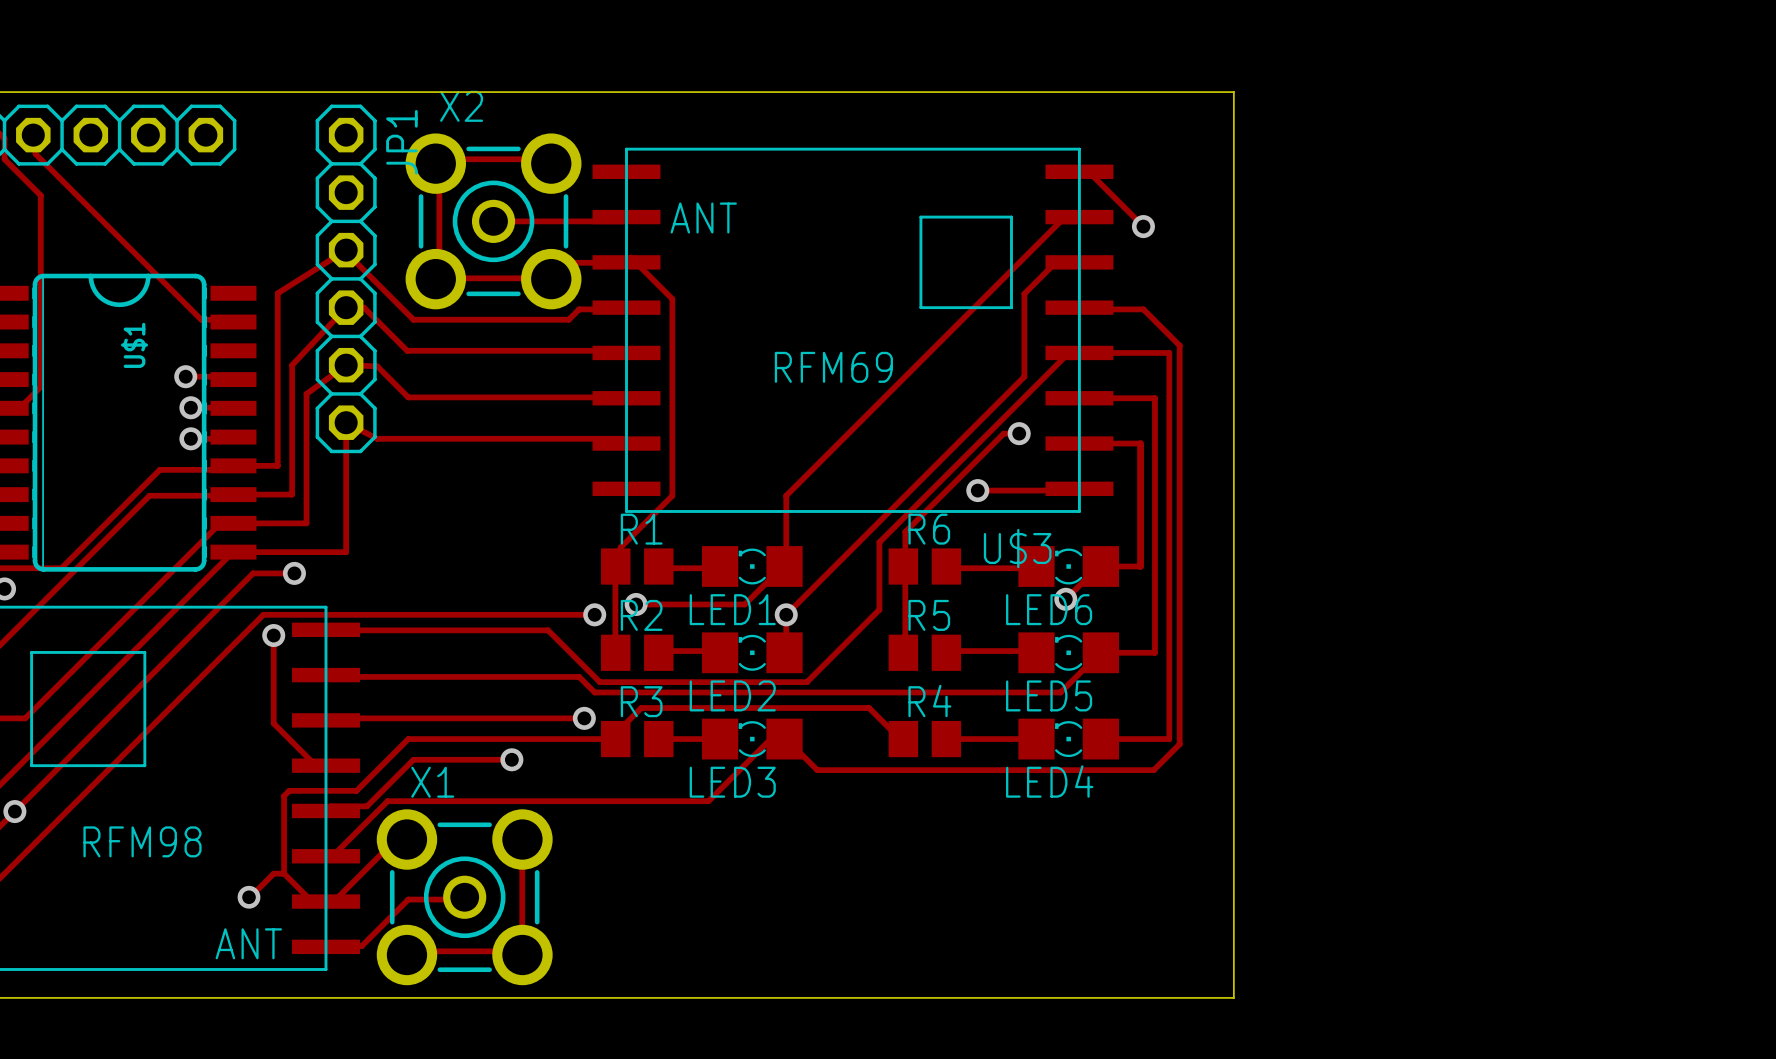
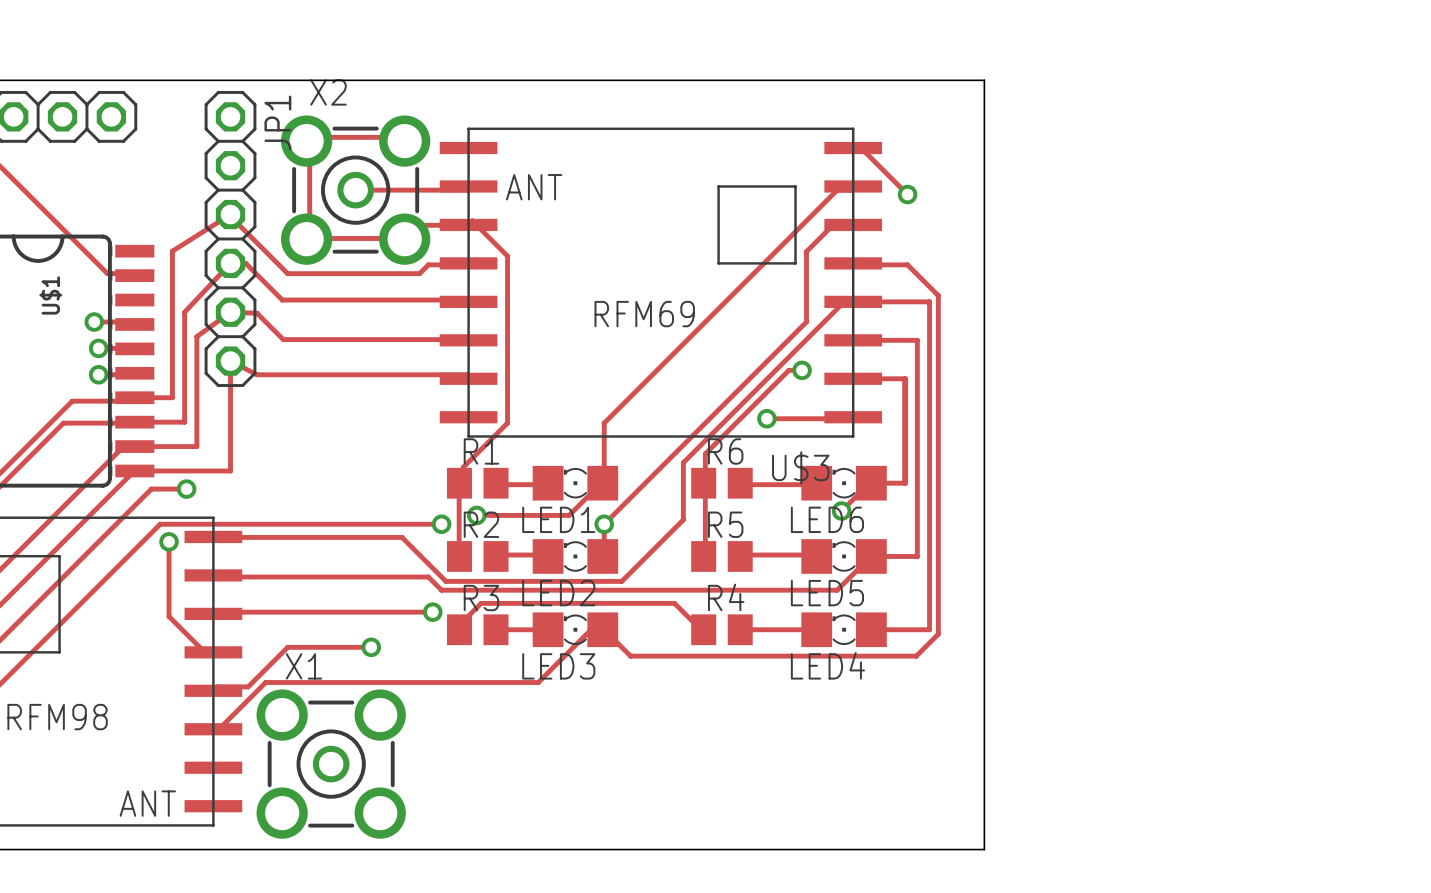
track: (615, 739) (408, 739) (356, 790) (289, 790) (284, 796) (284, 873) -> none
track: (522, 839) (522, 951) -> none
track: (403, 842) (392, 842) (330, 904) (326, 901) -> none
track: (284, 873) (315, 904) -> none
track: (284, 873) (273, 873) (249, 897) -> none
via: (249, 897) -> none
track: (464, 897) (460, 899) (408, 899) (361, 946) (326, 946) -> none
track: (522, 951) (408, 951) (406, 955) -> none

